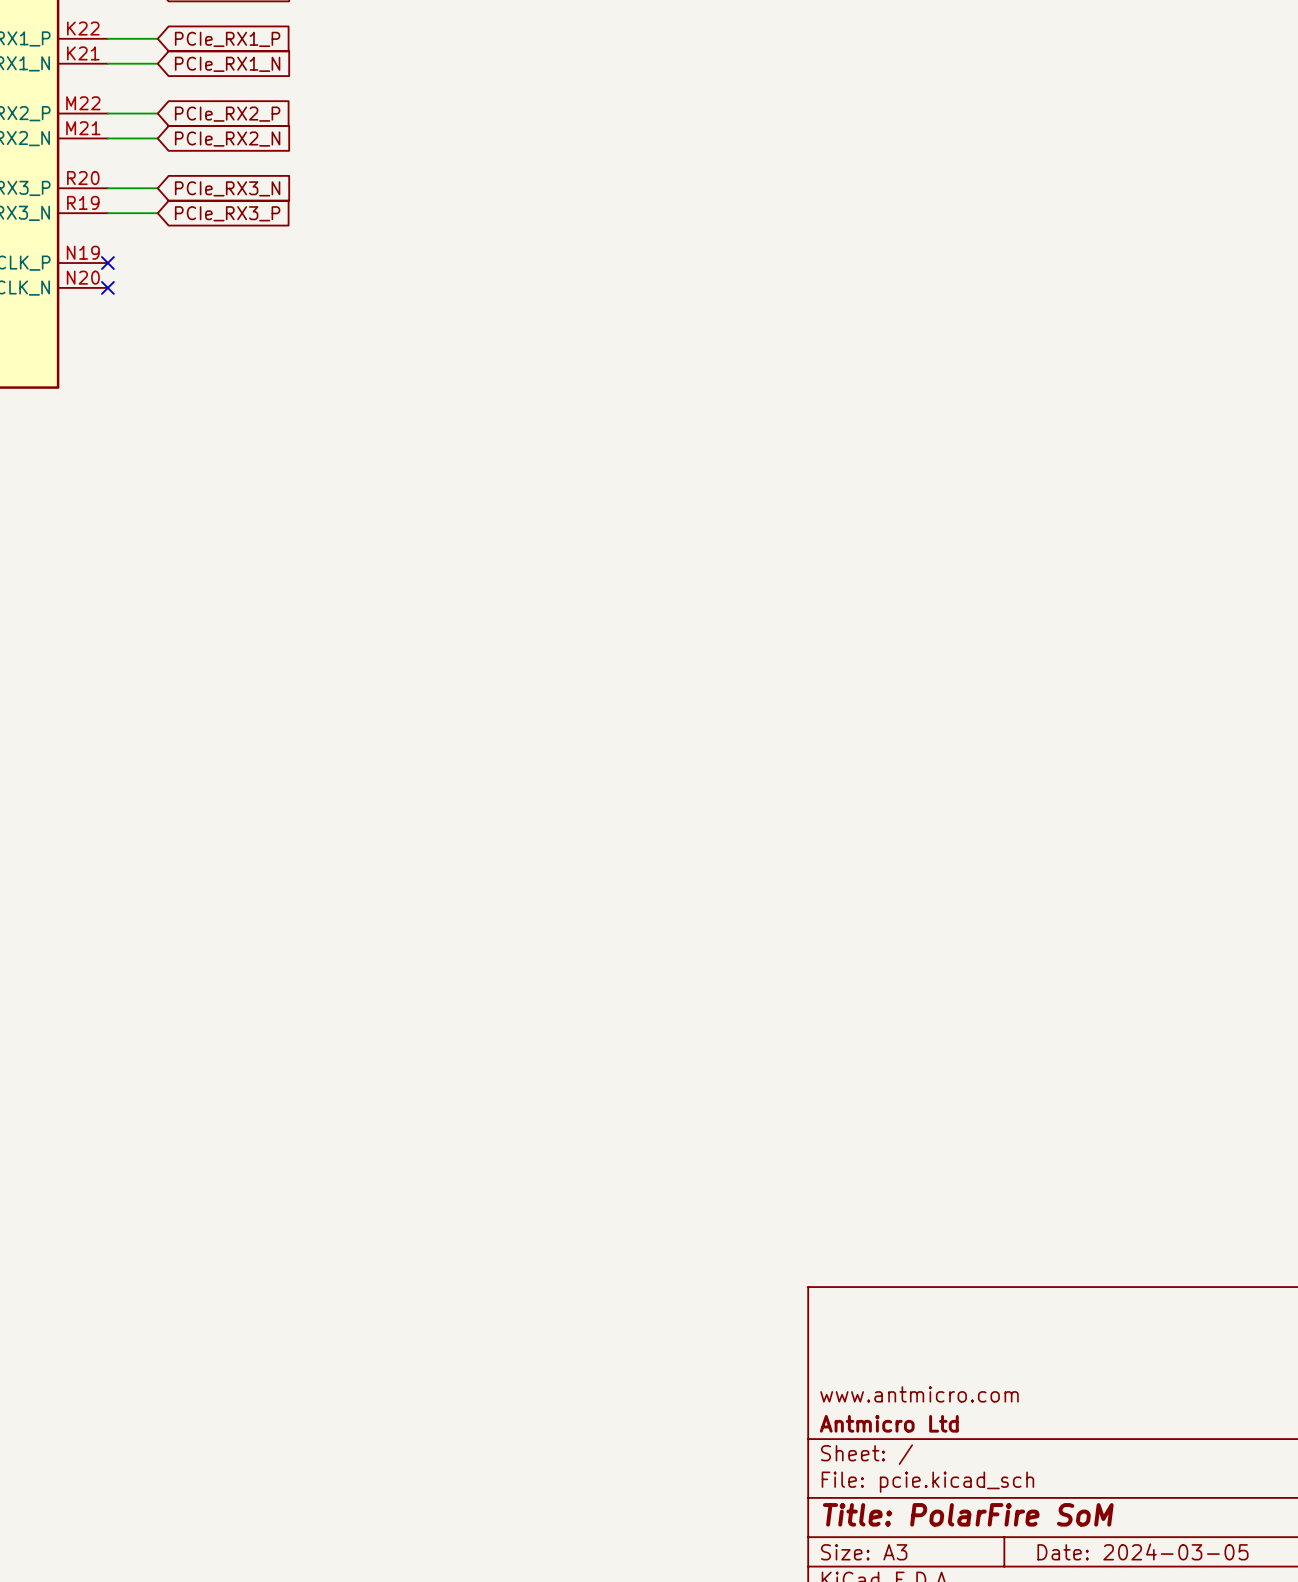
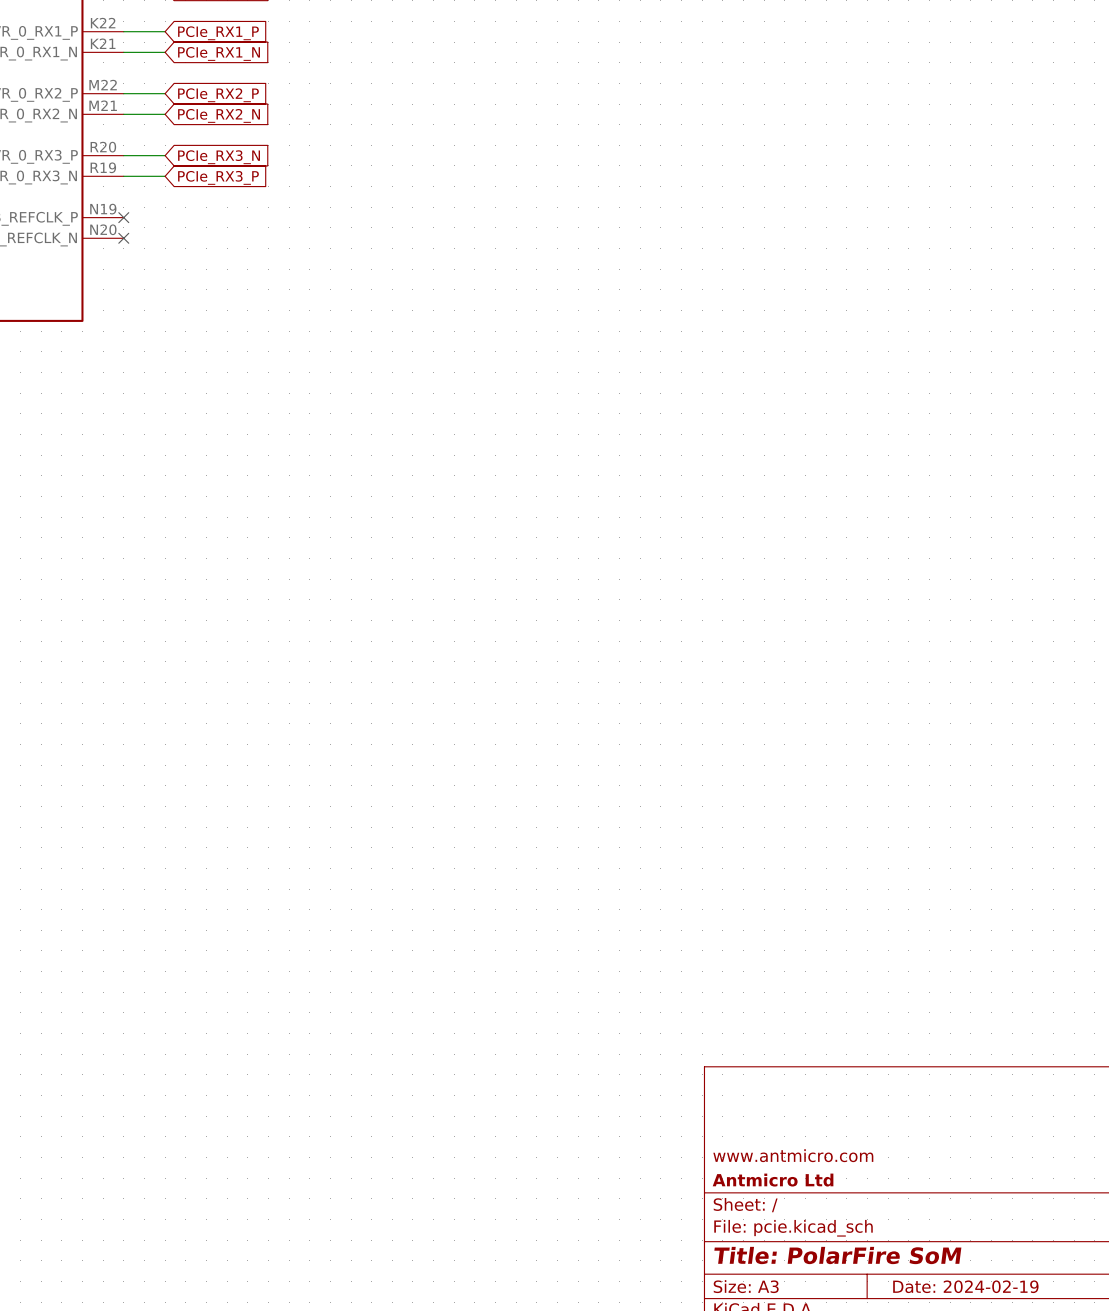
title block: Date: 2024-03-05 (1143, 1551) -> Date: 2024-02-19 (965, 1286)

